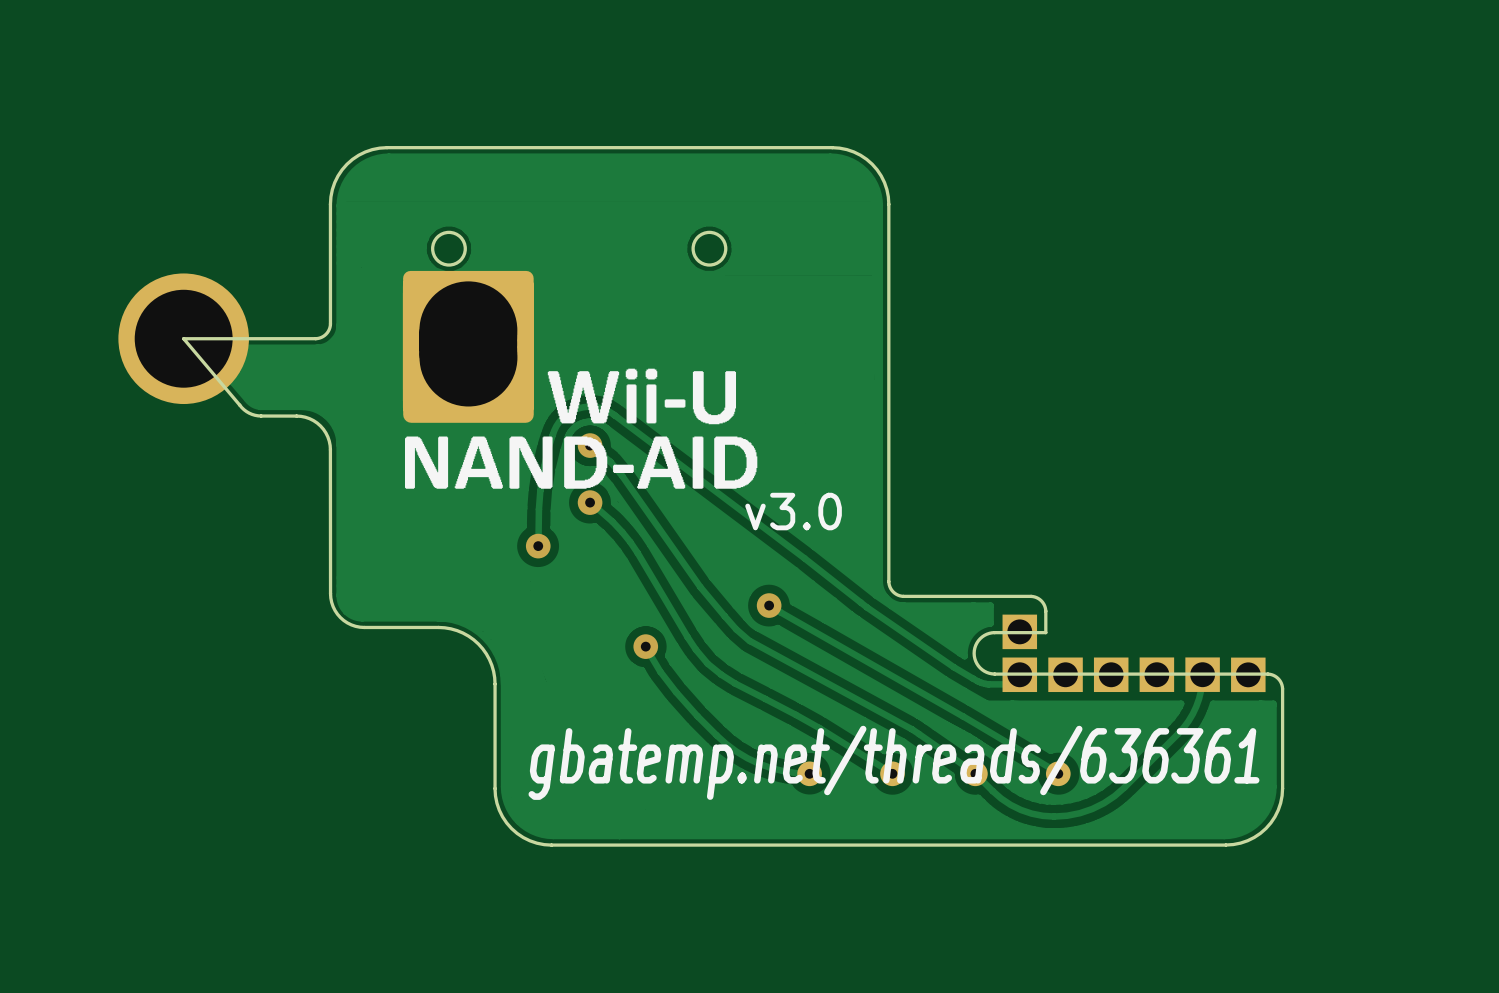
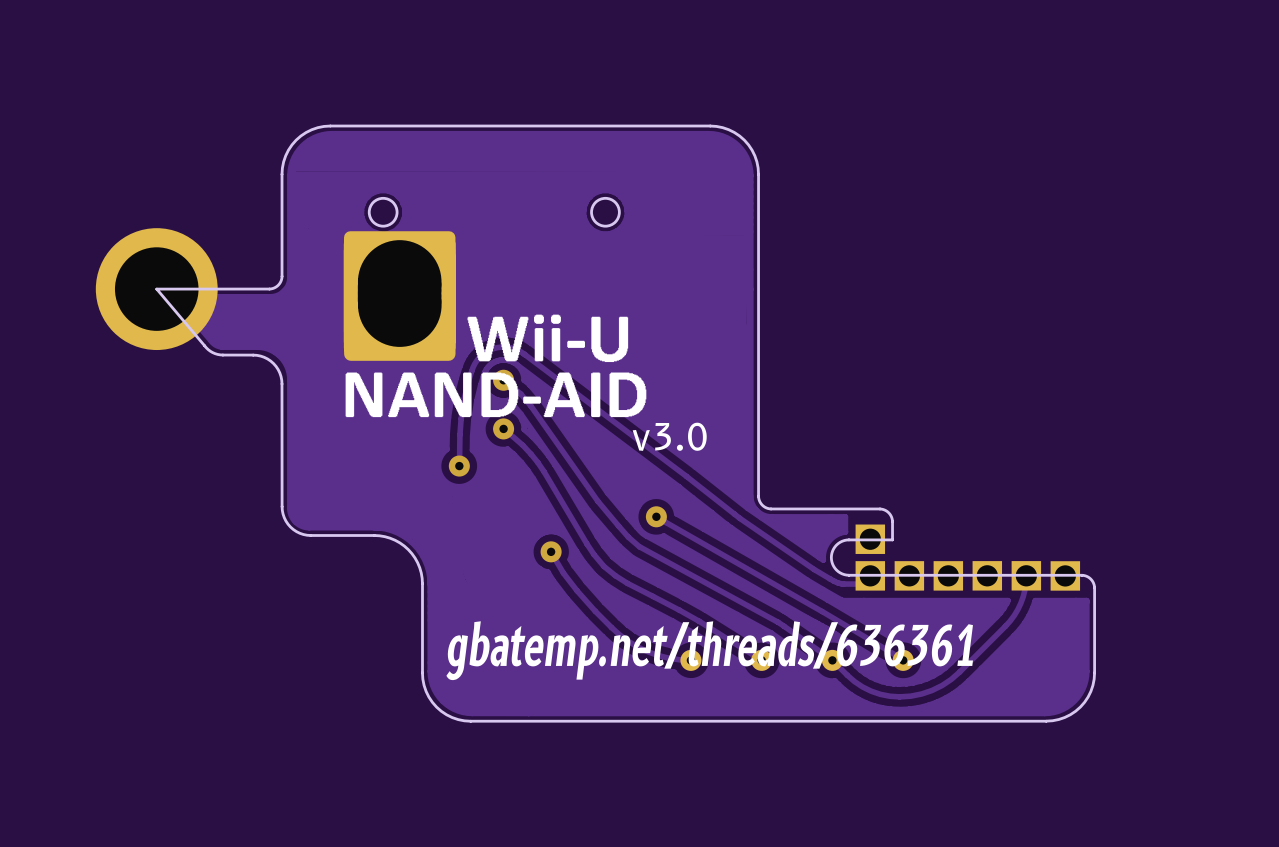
part footprint: [118, 273, 249, 405] -> [95, 228, 218, 351]

